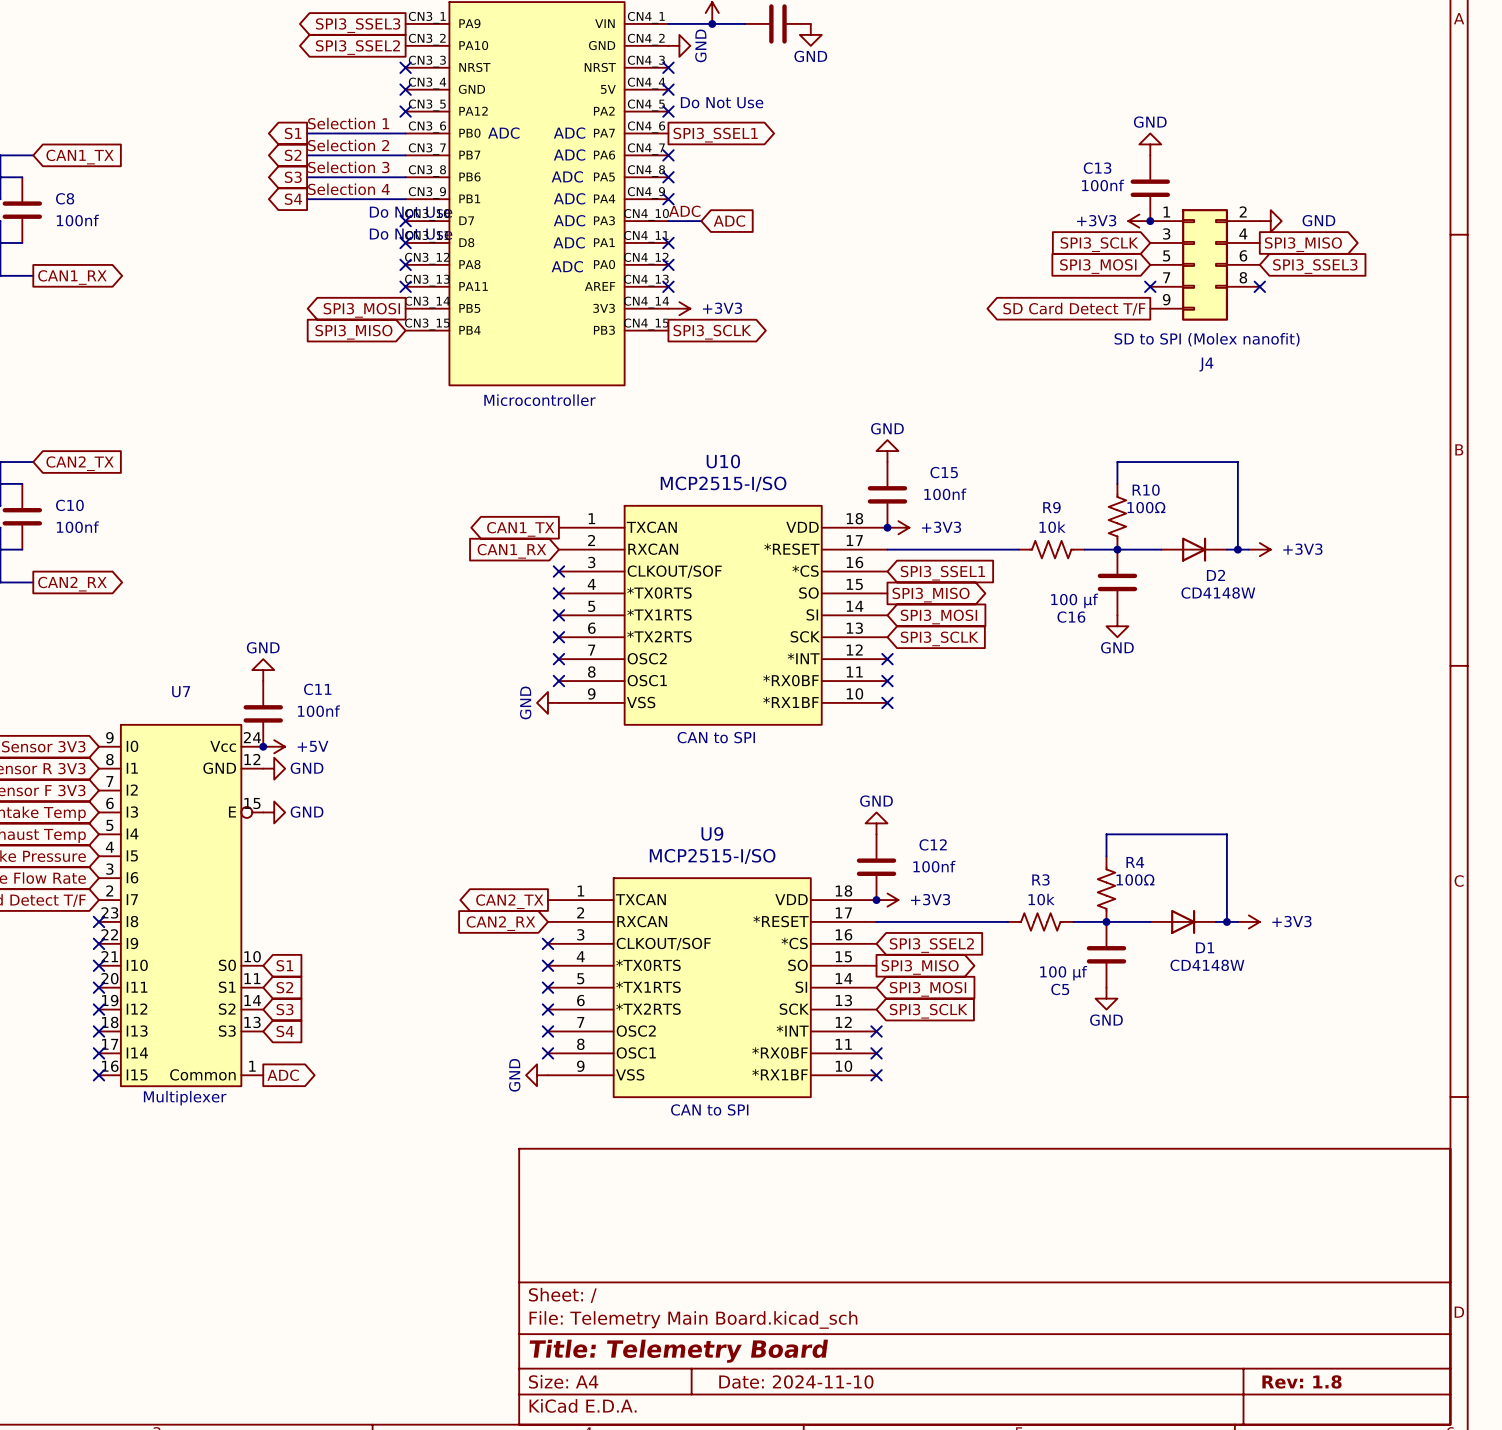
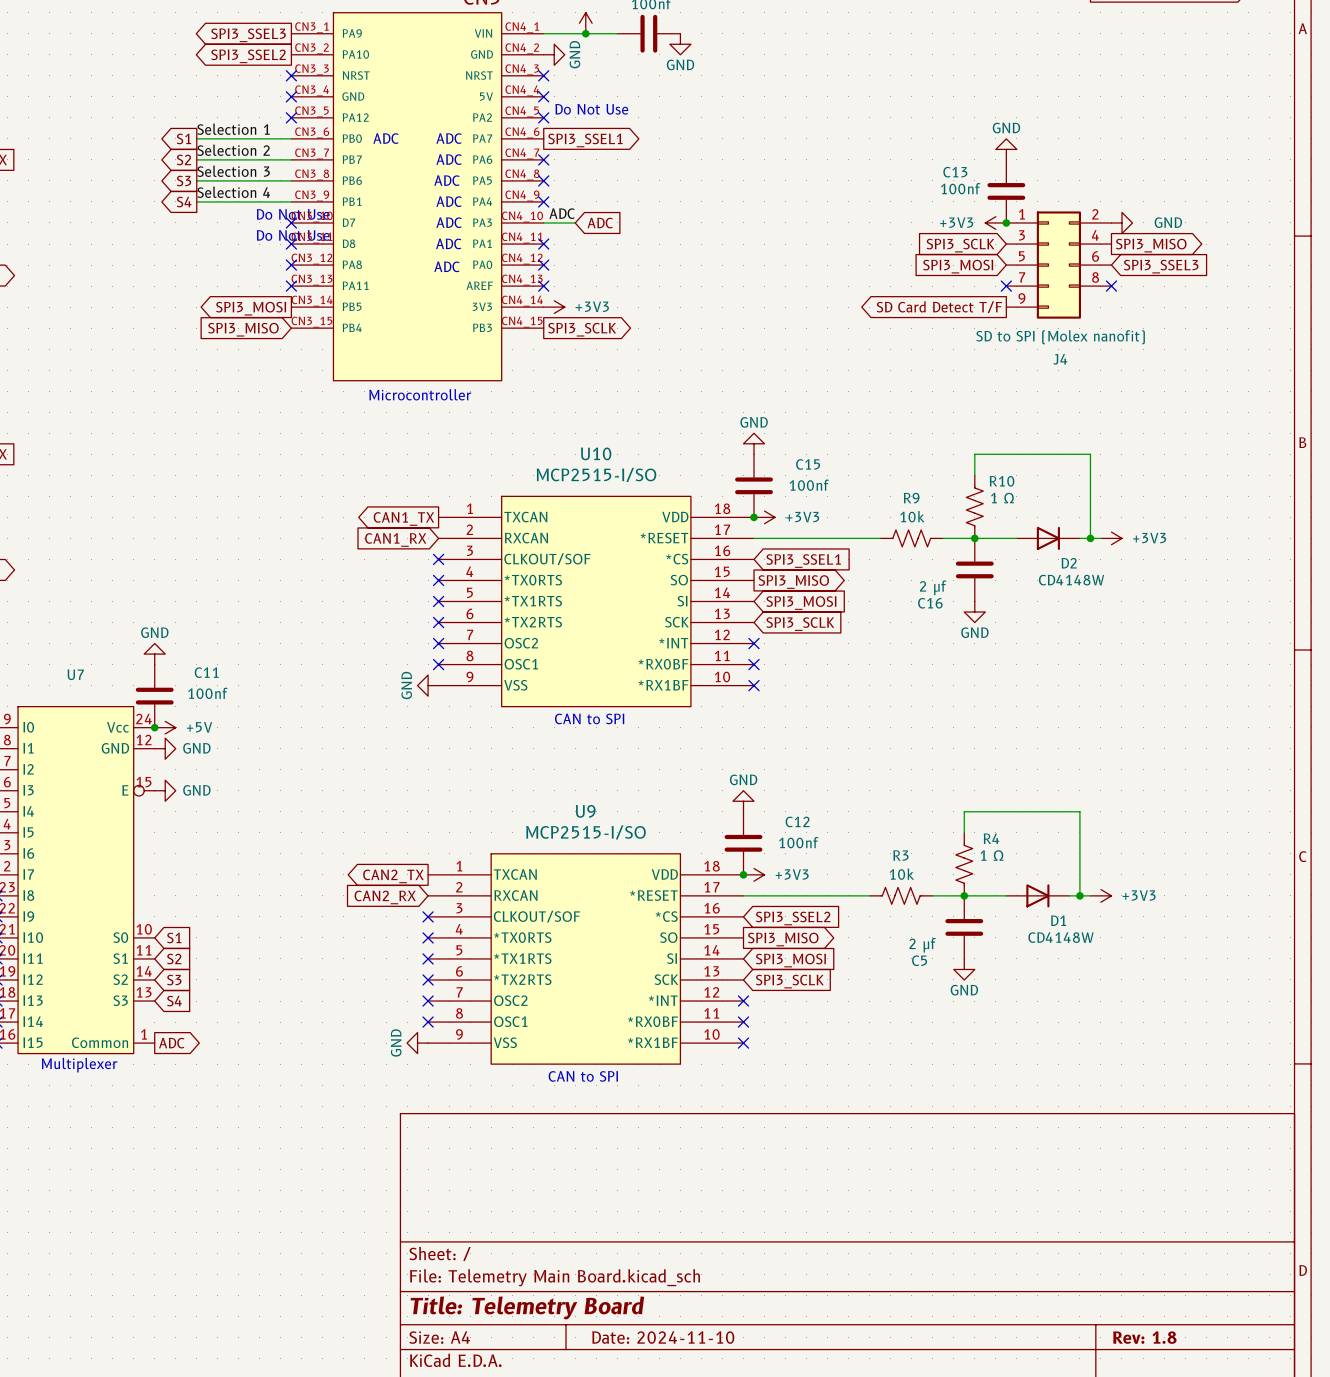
R10 value: 100Ω (1146, 507) -> 1 Ω (1002, 498)
C16 value: 100 μf (1074, 600) -> 2 μf (933, 587)
R4 value: 100Ω (1135, 879) -> 1 Ω (991, 855)
C5 value: 100 μf (1063, 973) -> 2 μf (922, 945)

